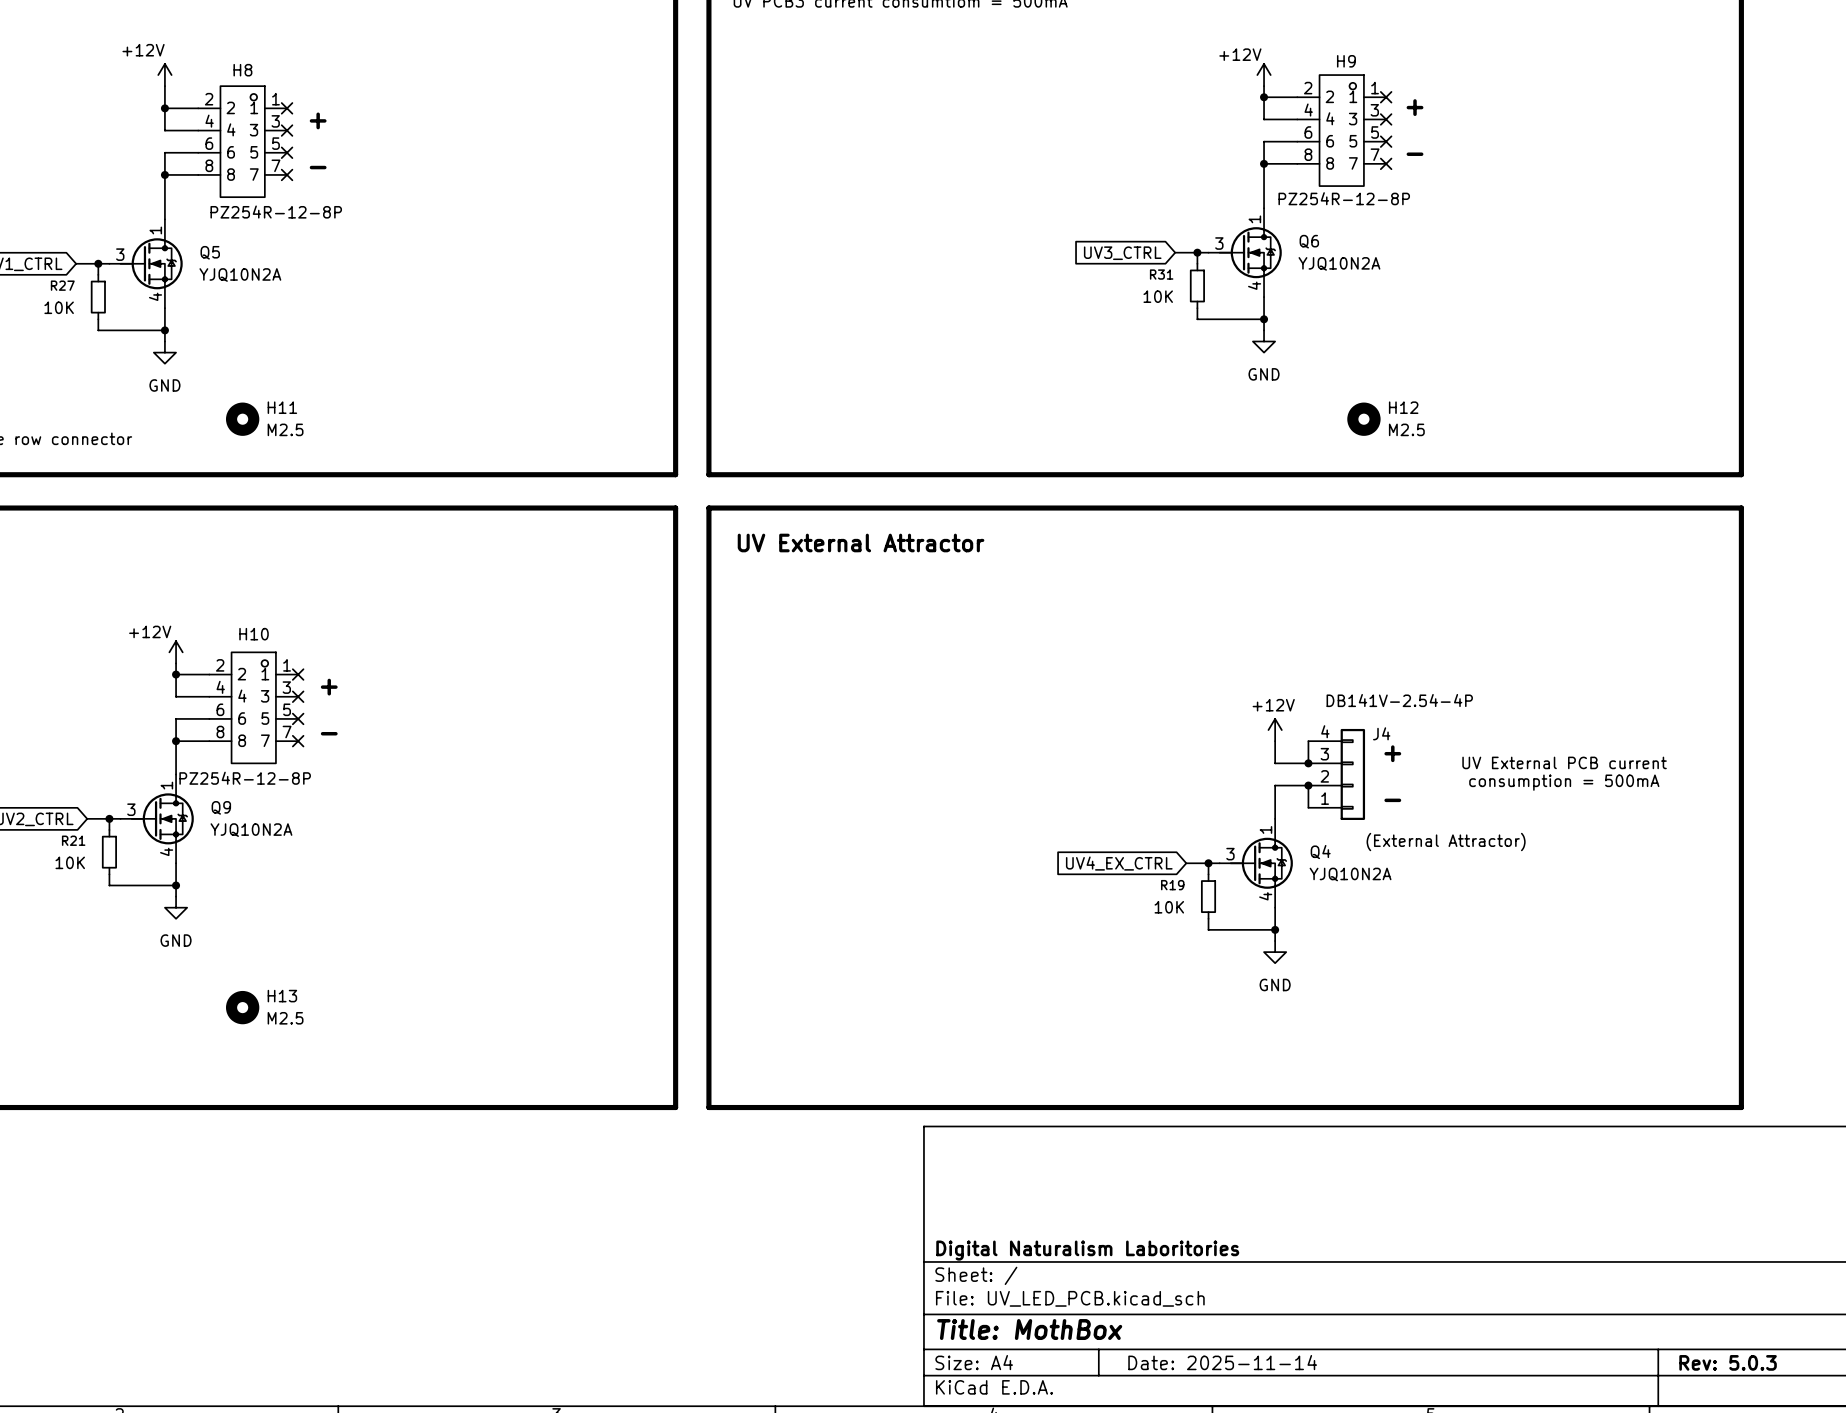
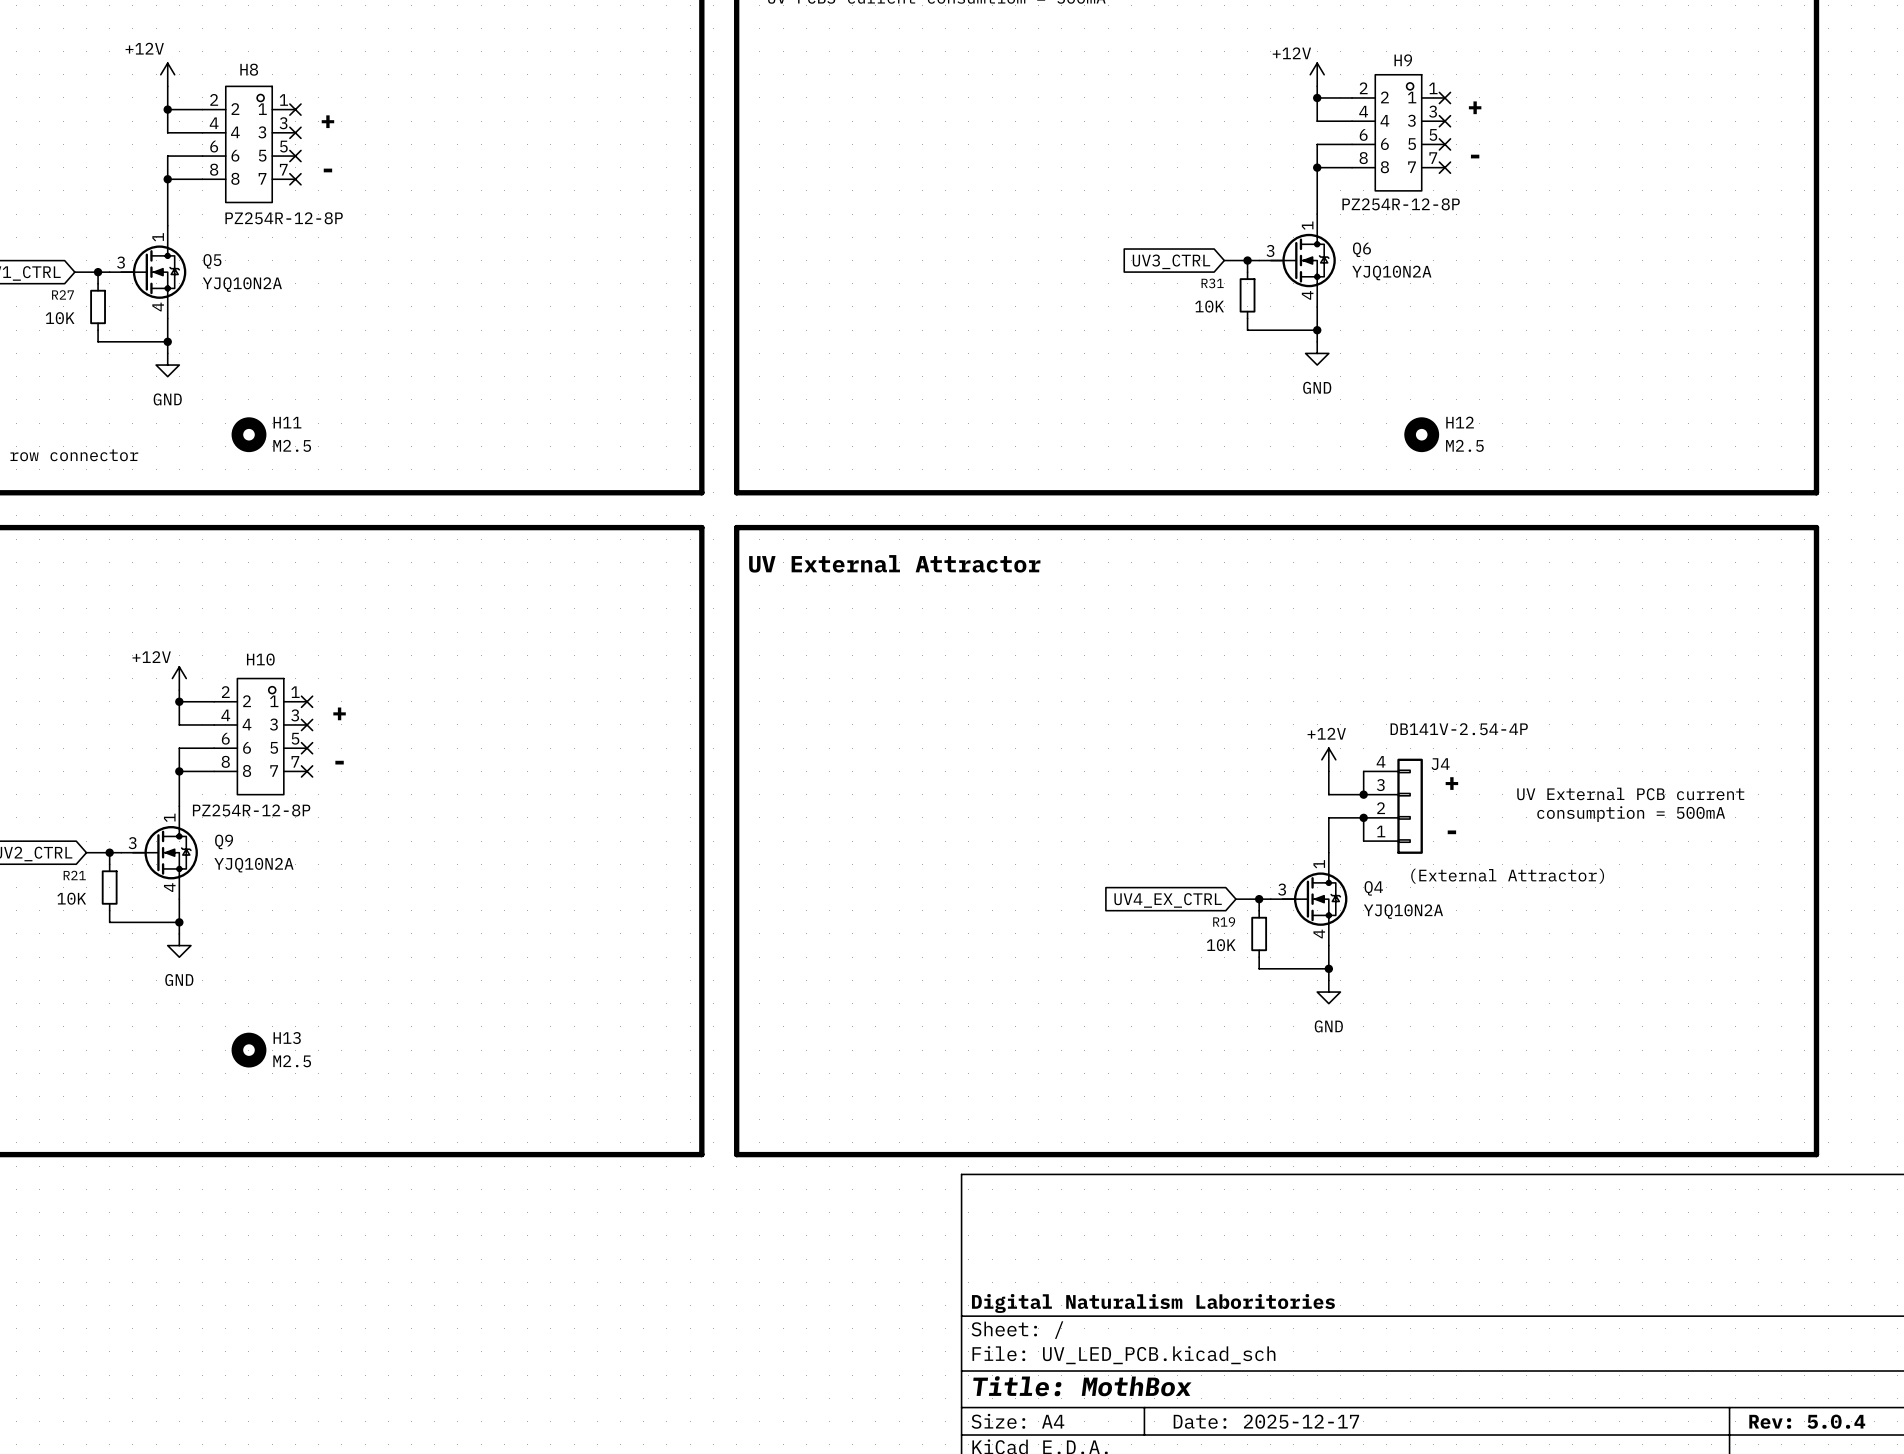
title block: Date: 2025-11-14 (1222, 1362) -> Date: 2025-12-17 (1266, 1421)
title block: Rev: 5.0.3 (1728, 1362) -> Rev: 5.0.4 (1807, 1421)

